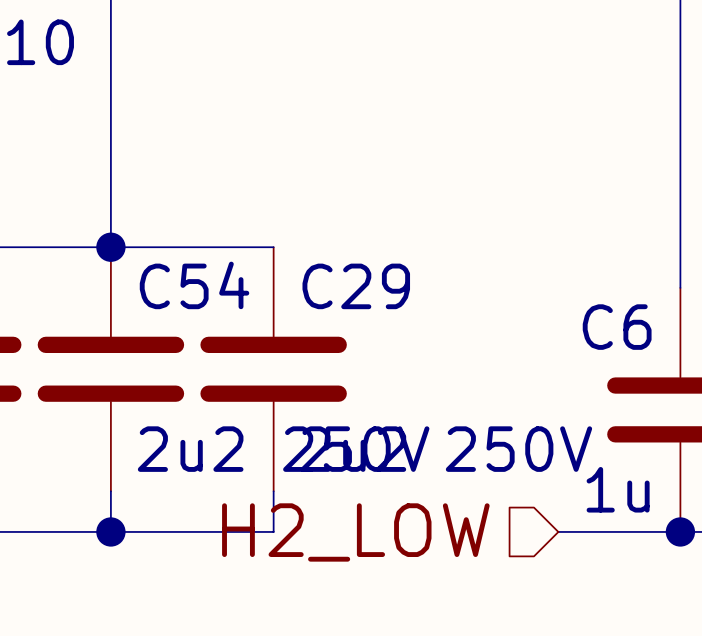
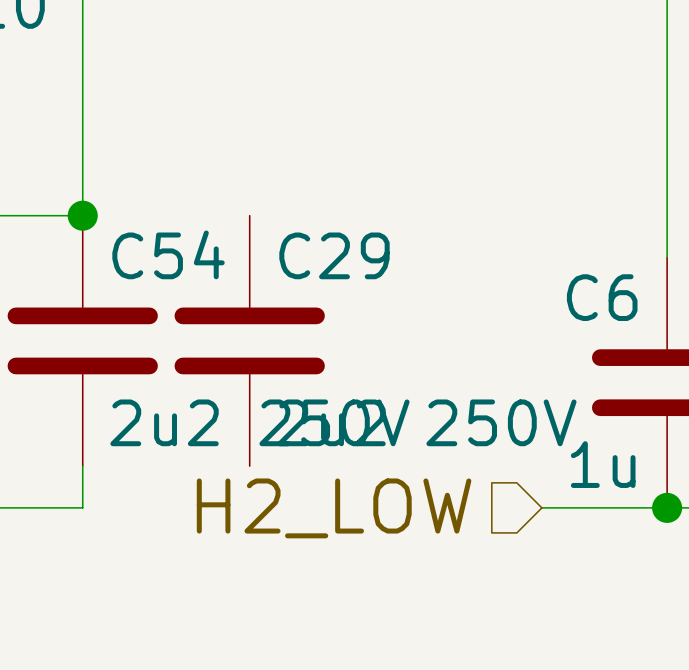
wire: (110, 247) (273, 247) -> none
wire: (273, 491) (273, 531) (110, 531) -> none
junction: (110, 531) -> none

